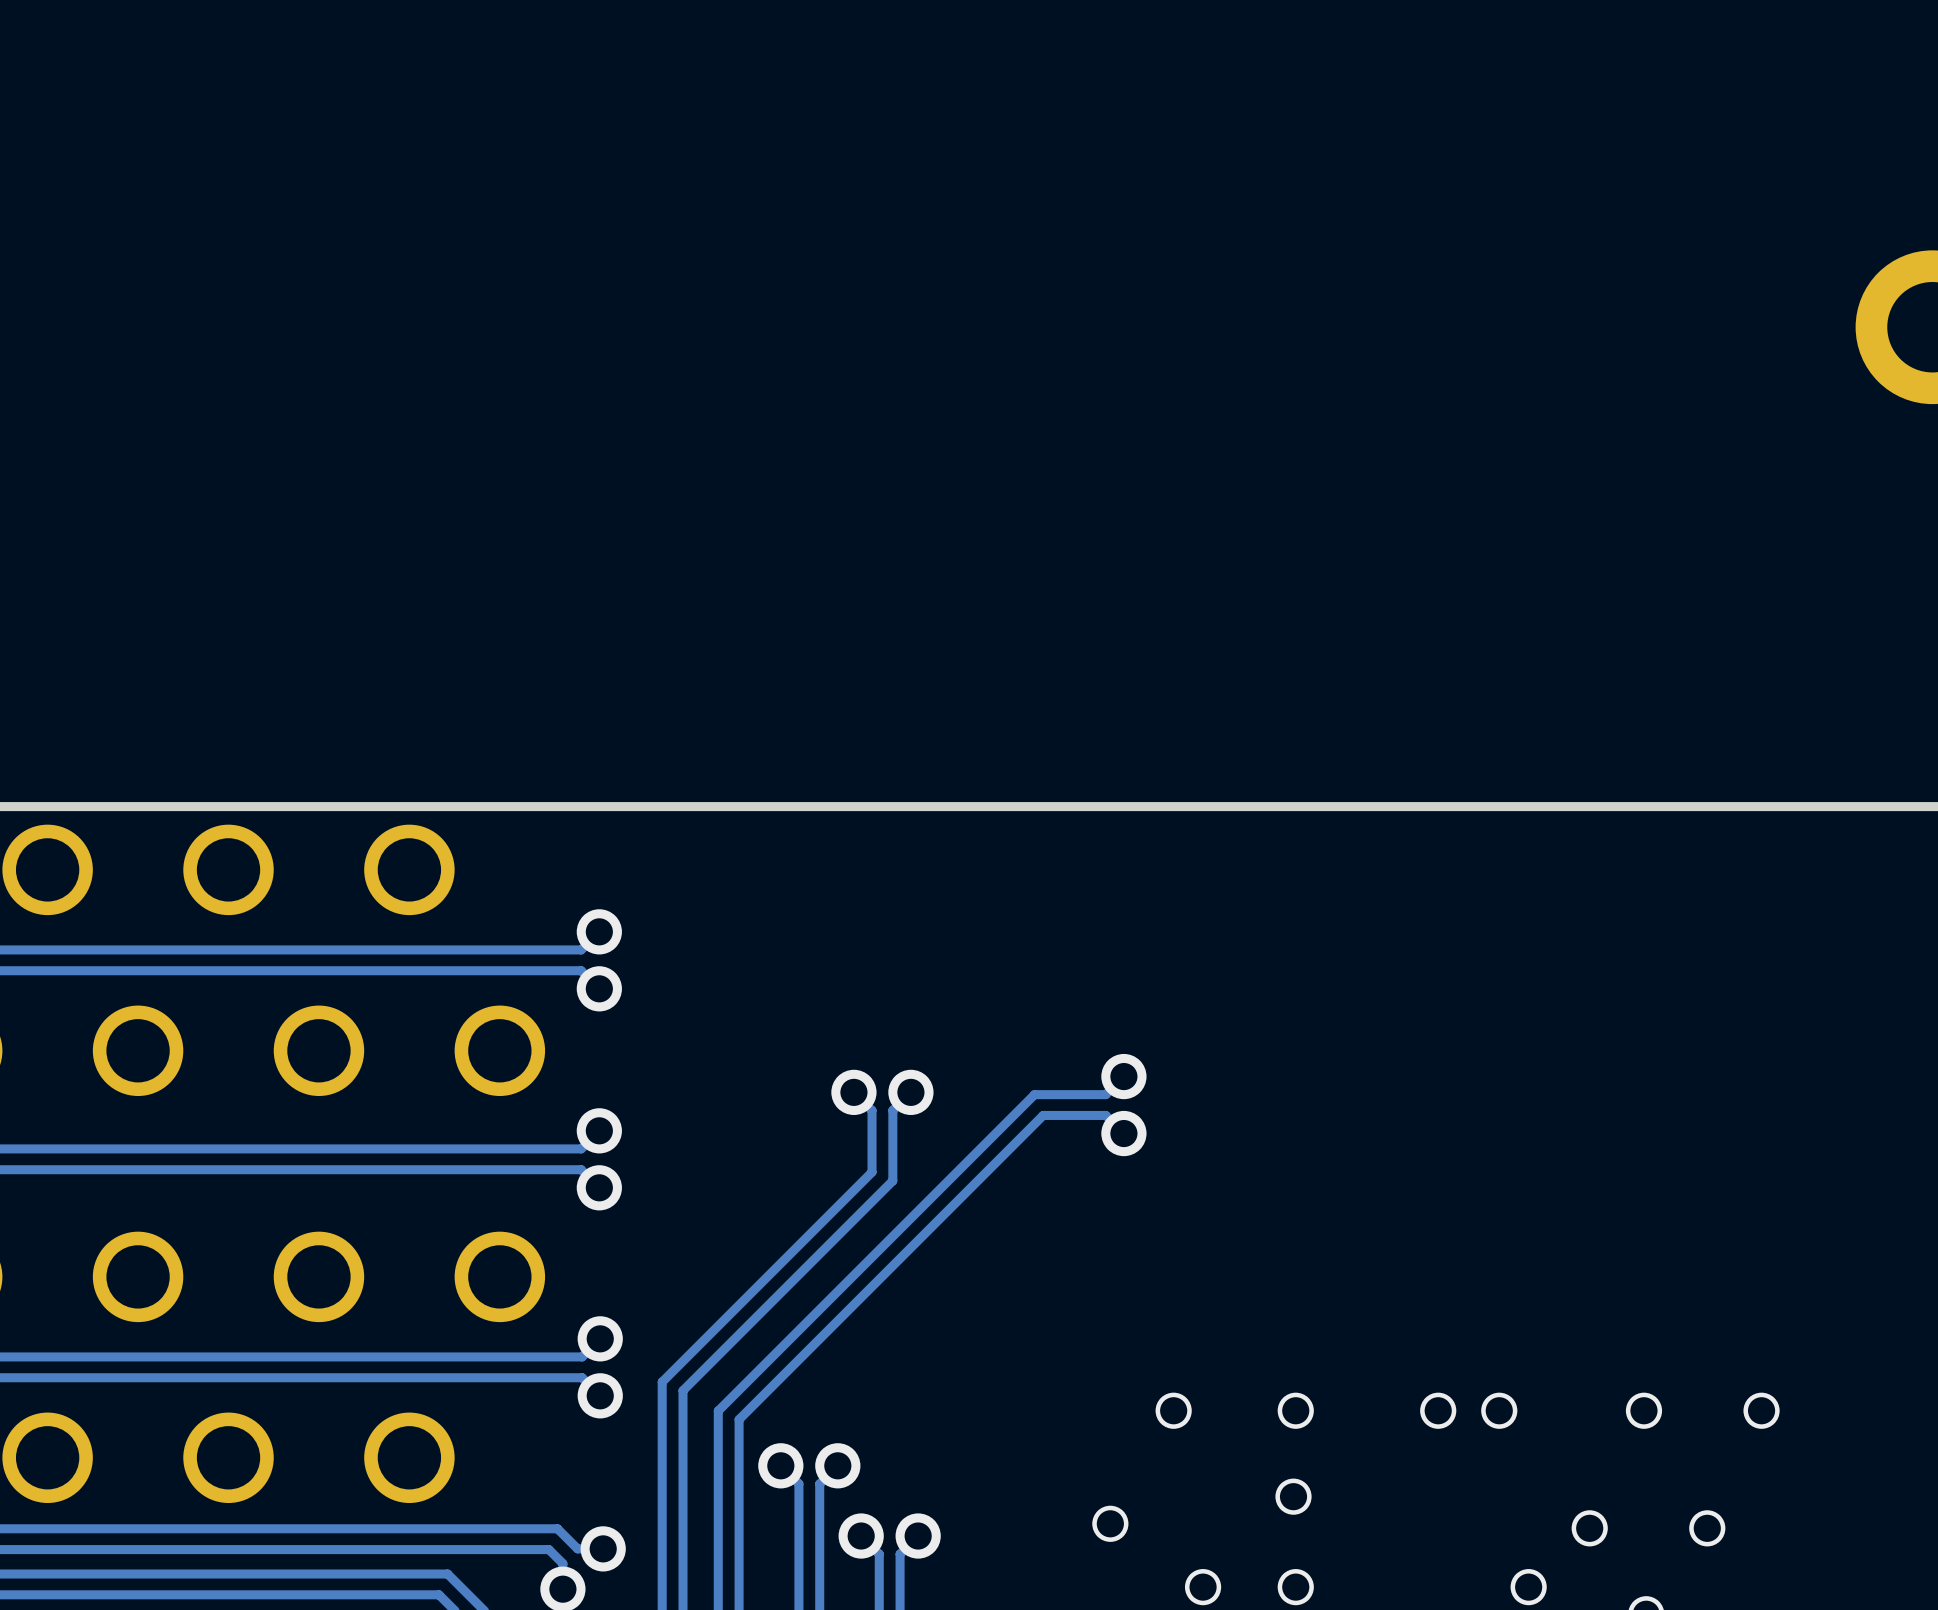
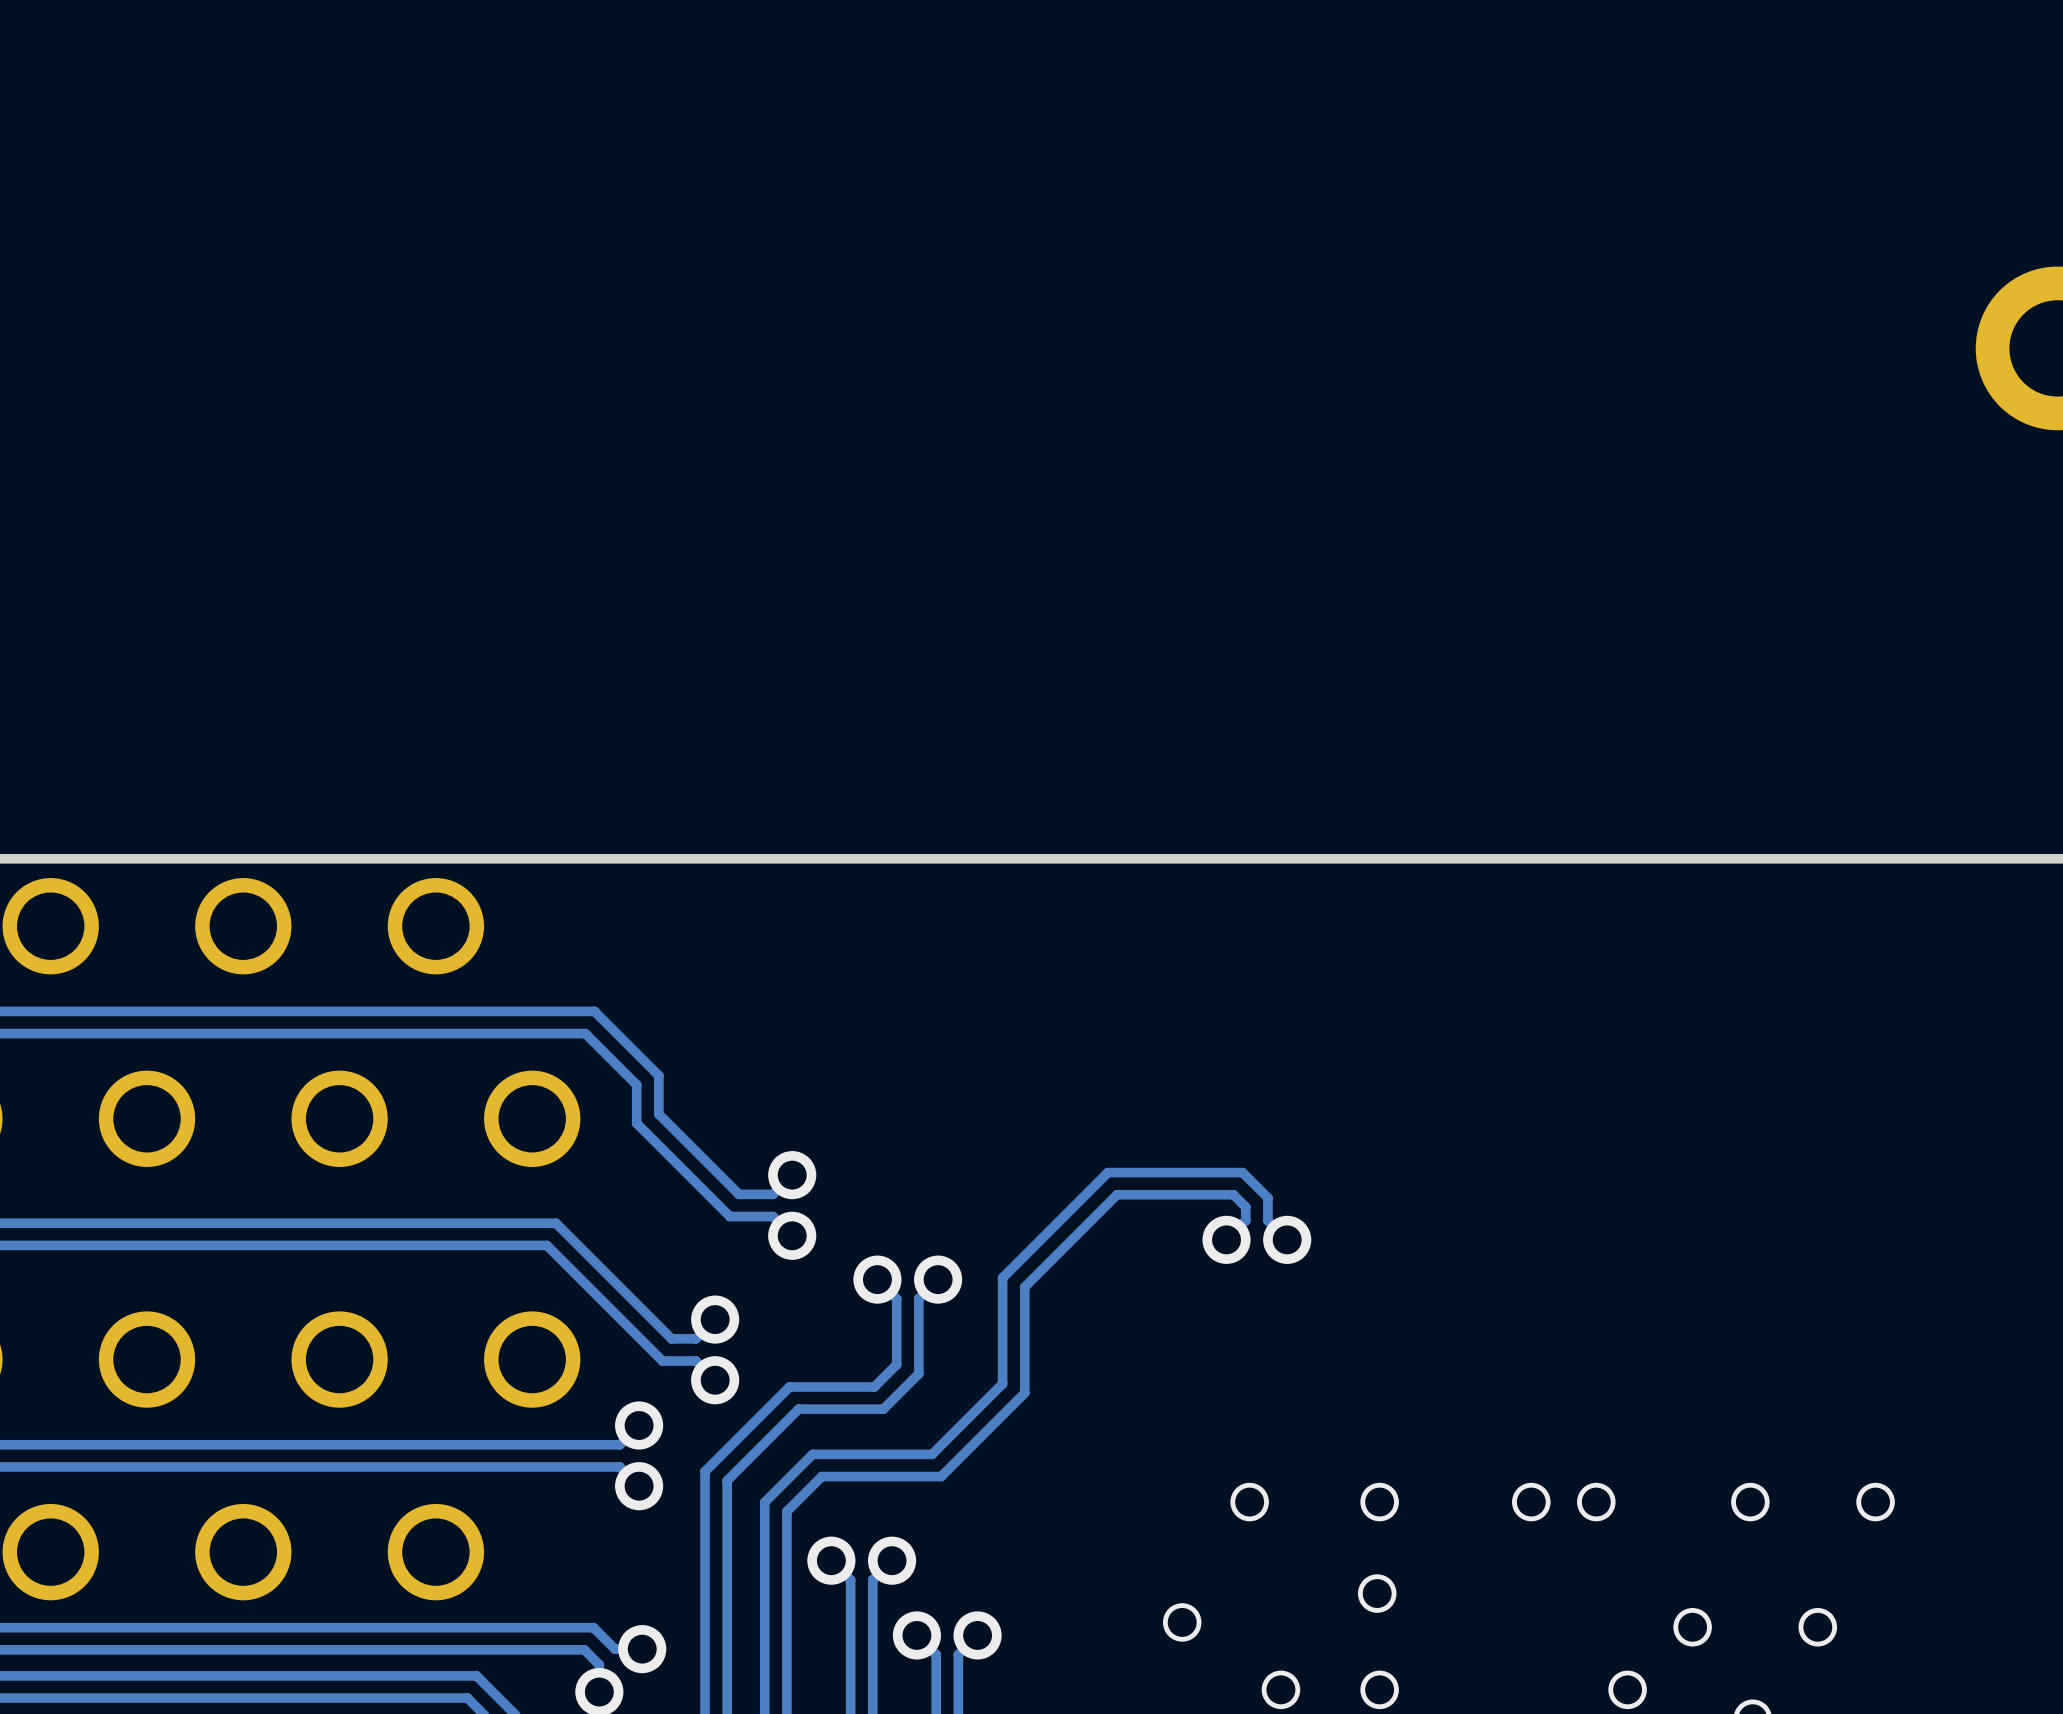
track: (599, 931) (581, 949) (558, 949) -> (792, 1175) (772, 1194) (739, 1194) (658, 1114) (658, 1075) (594, 1011)
via: (599, 931) -> none
track: (549, 970) (581, 970) (599, 988) -> (585, 1033) (636, 1084) (636, 1123) (729, 1216) (772, 1216) (792, 1235)
via: (599, 988) -> none
track: (1123, 1076) (1105, 1094) (1034, 1094) (763, 1365) -> (1287, 1239) (1267, 1220) (1267, 1197) (1242, 1172) (1107, 1172) (1002, 1277) (1002, 1383) (932, 1454) (812, 1454)
via: (1123, 1076) -> none
track: (853, 1092) (872, 1110) (872, 1172) (741, 1302) -> (877, 1279) (896, 1298) (896, 1364) (874, 1386) (789, 1386)
via: (853, 1092) -> none
track: (910, 1092) (892, 1110) (892, 1180) (750, 1323) -> (938, 1279) (918, 1298) (918, 1373) (883, 1409) (798, 1409)
via: (910, 1092) -> none
via: none -> (792, 1175)
track: (599, 1130) (581, 1148) (522, 1148) -> (715, 1319) (695, 1338) (671, 1338) (556, 1223)
via: (599, 1130) -> none
track: (1123, 1133) (1105, 1115) (1043, 1115) (771, 1386) -> (1226, 1239) (1245, 1220) (1245, 1207) (1233, 1194) (1117, 1194) (1024, 1287) (1024, 1393) (941, 1476) (821, 1476)
via position: (1123, 1133) -> (1226, 1239)
via: none -> (792, 1235)
via: none -> (1287, 1239)
track: (513, 1169) (581, 1169) (599, 1187) -> (546, 1245) (662, 1360) (695, 1360) (715, 1380)
via: (599, 1187) -> none
via: none -> (877, 1279)
via: none -> (938, 1279)
via: none -> (715, 1319)
via: none -> (715, 1380)

